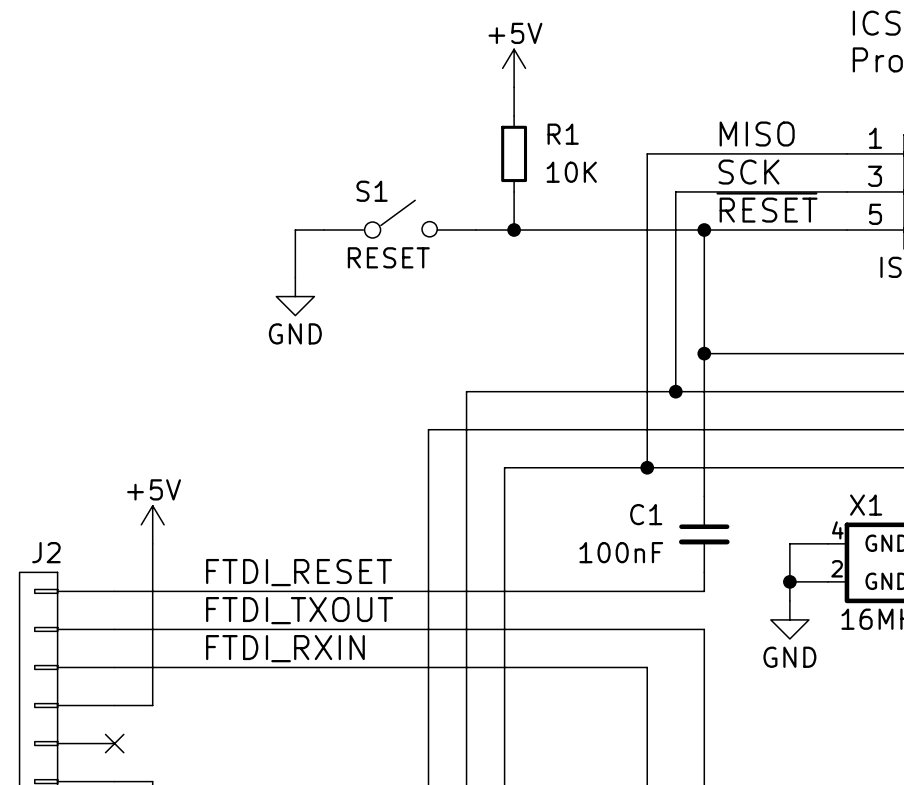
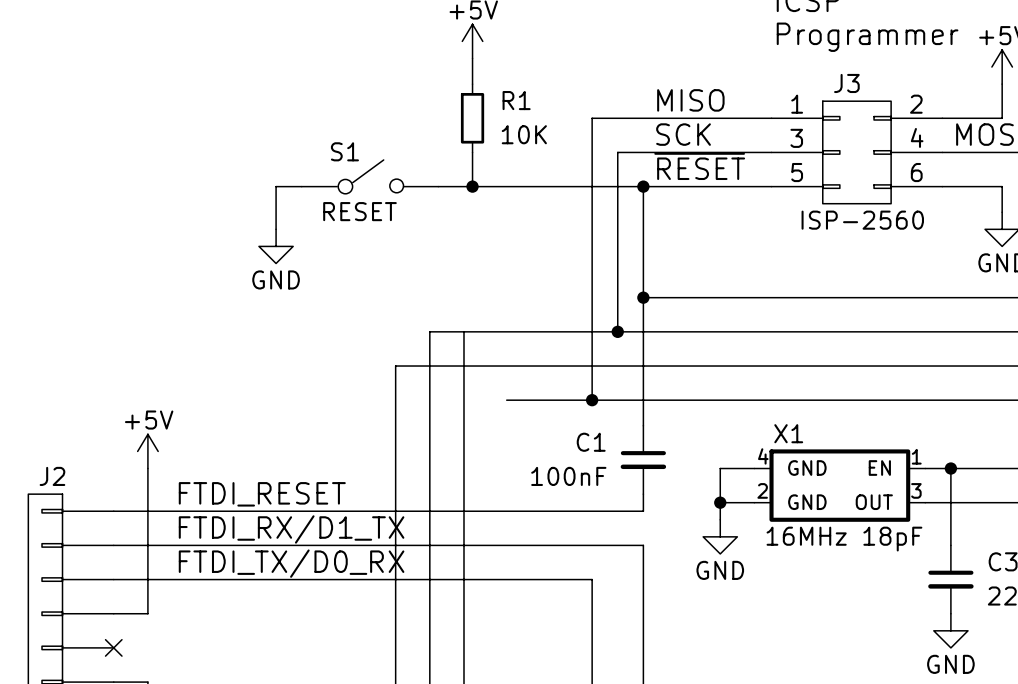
wire: (504, 467) (552, 467) -> (463, 400) (463, 331)
label position: FTDI_RESET (299, 572) -> FTDI_RESET (262, 494)
label: FTDI_TXOUT (299, 610) -> FTDI_RX/D1_TX (291, 529)
label: FTDI_RXIN (285, 648) -> FTDI_TX/D0_RX (291, 563)

